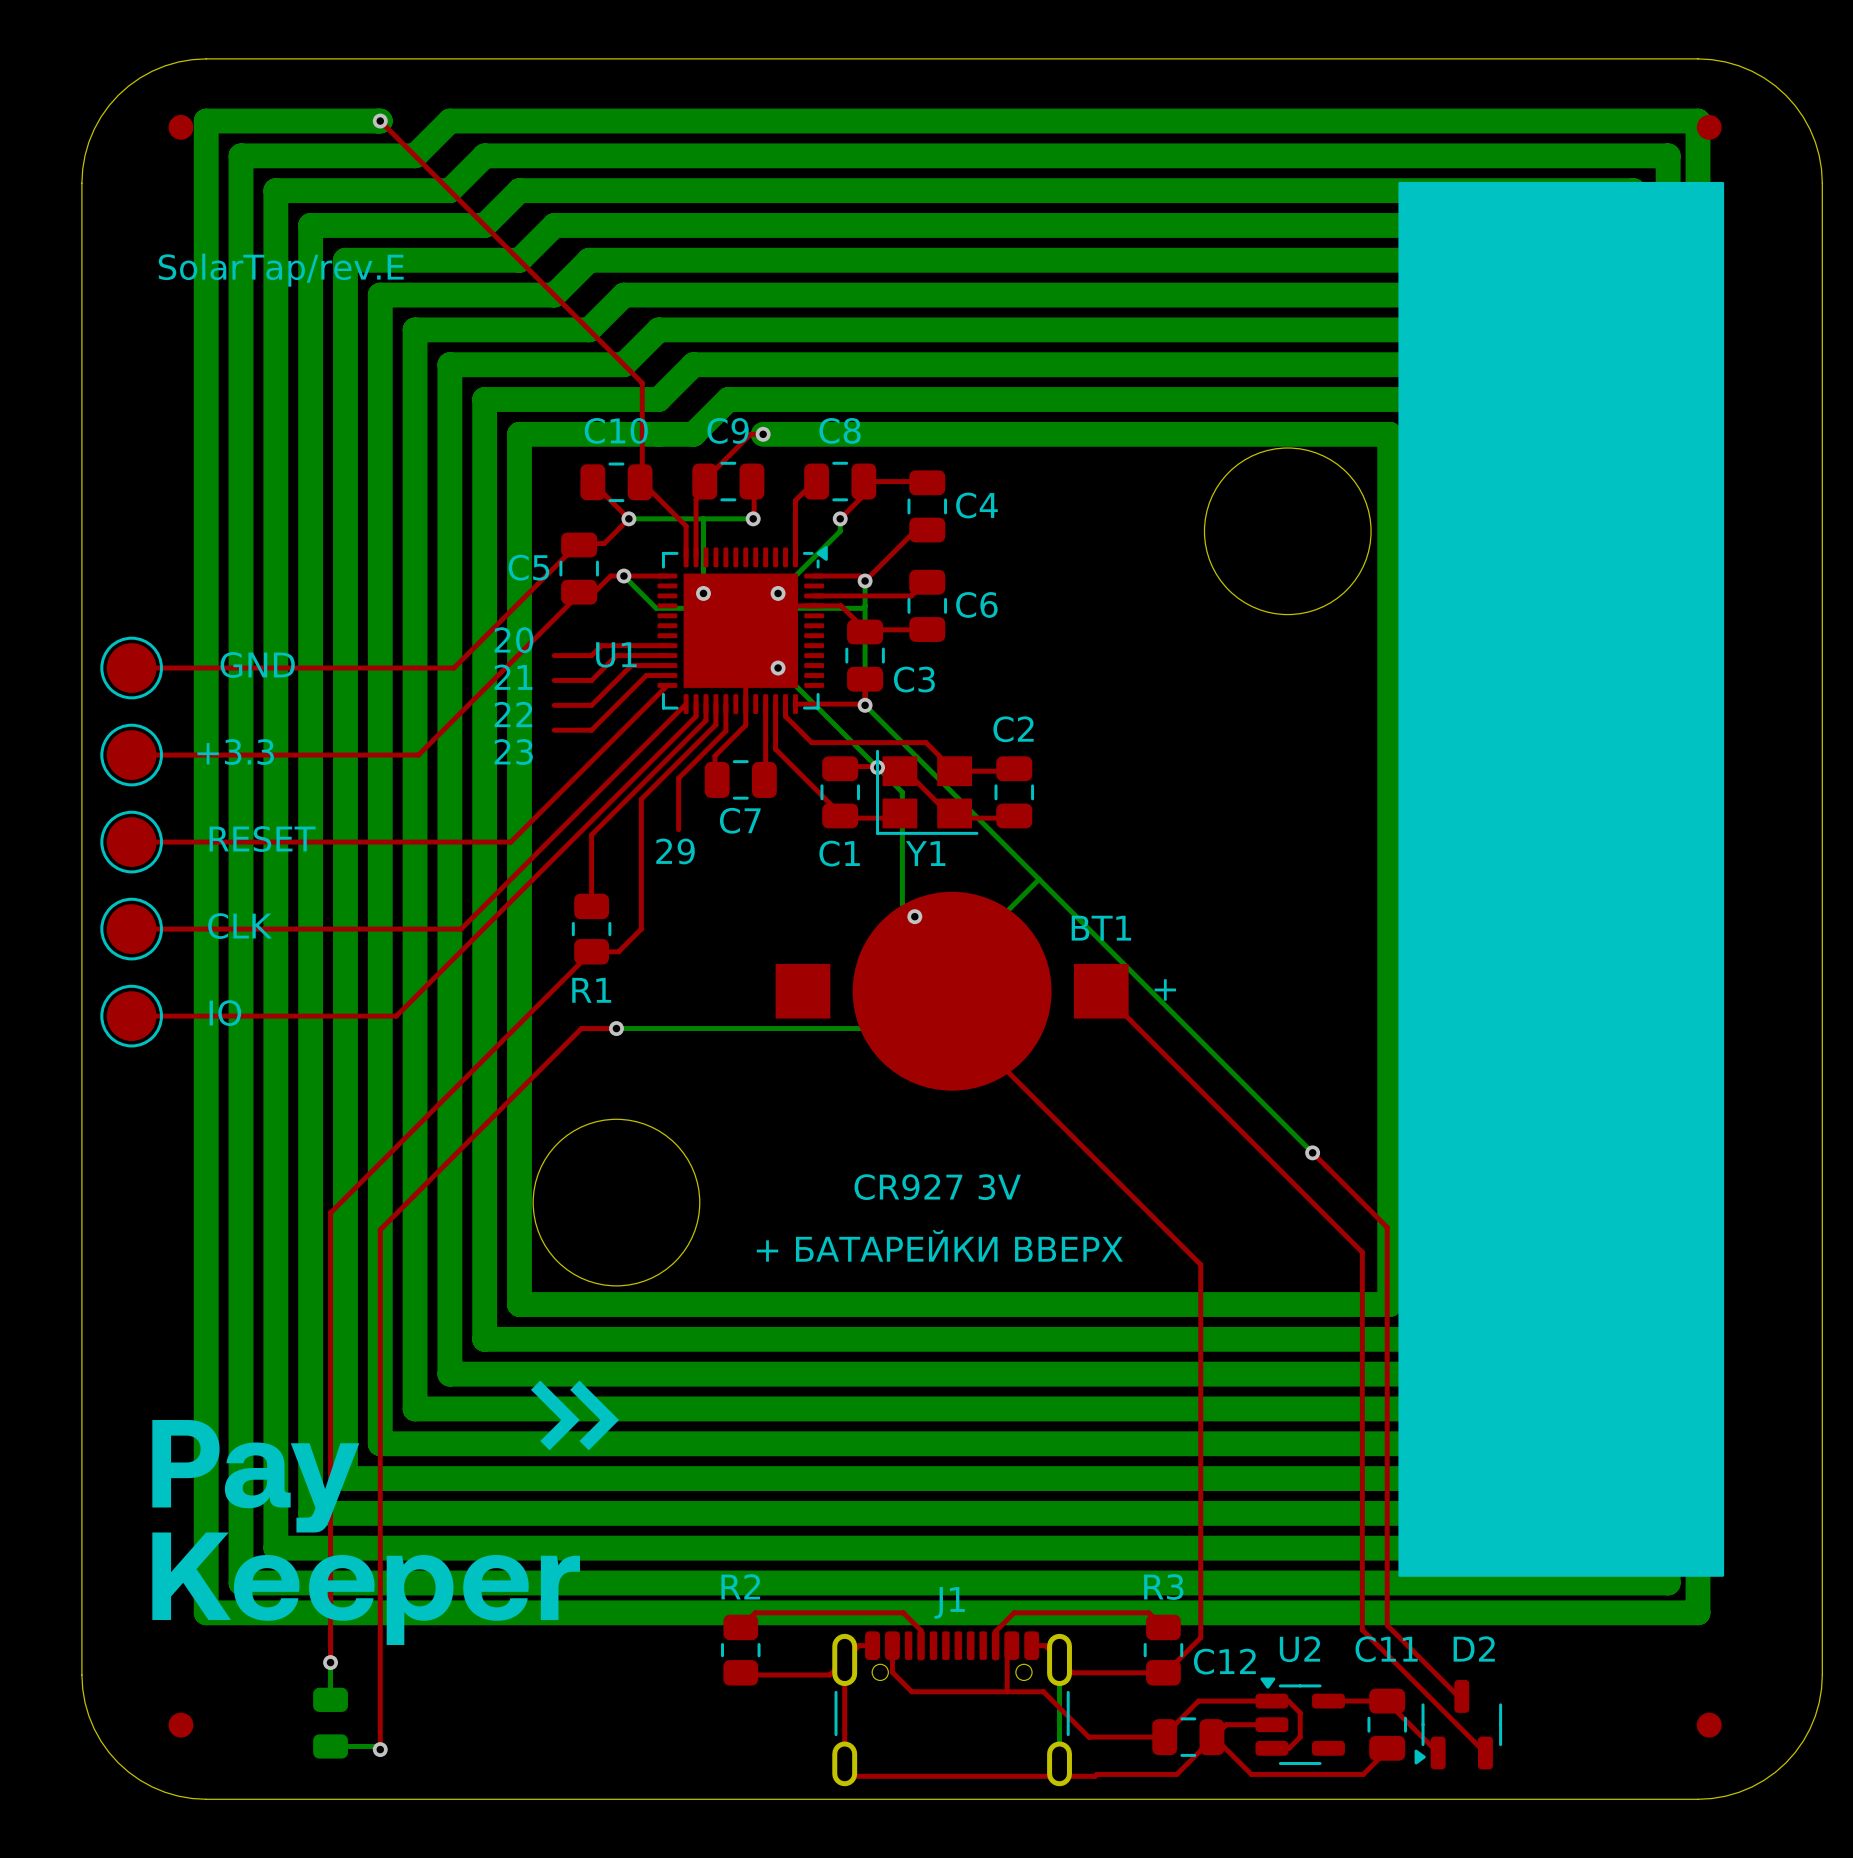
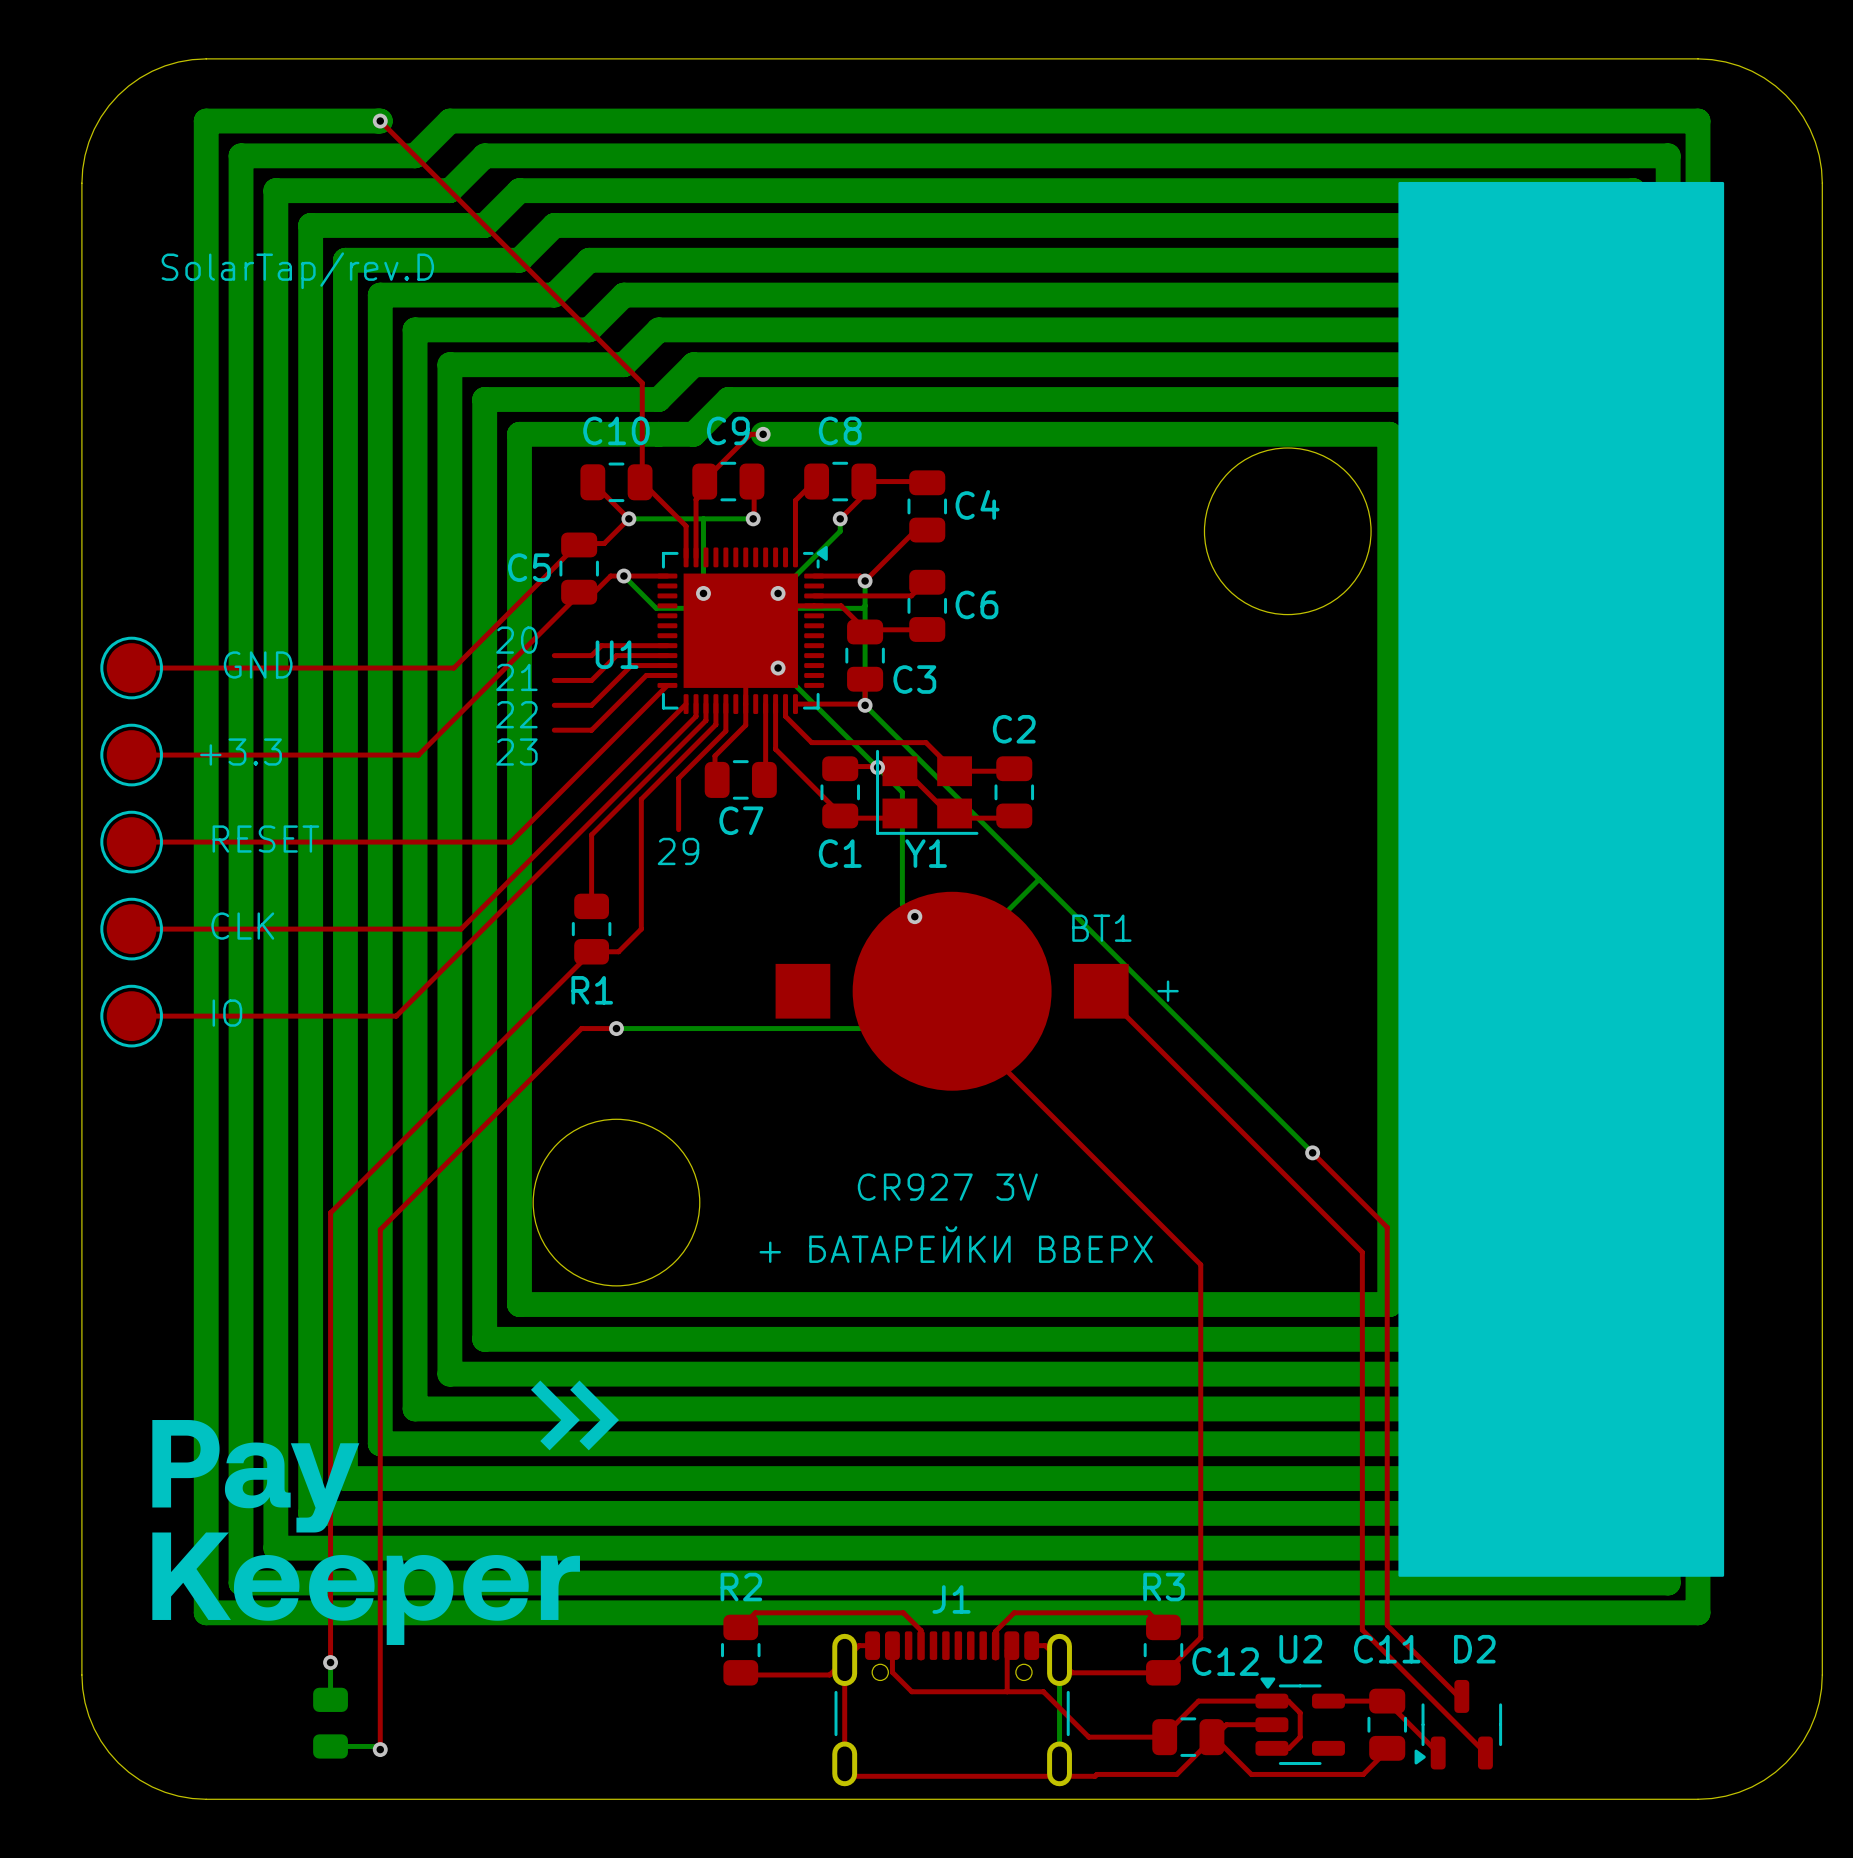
part: (180, 127) -> none
part: (1709, 127) -> none
text: SolarTap/rev.E (281, 270) -> SolarTap/rev.D (297, 270)
part: (180, 1725) -> none
part: (1709, 1725) -> none

